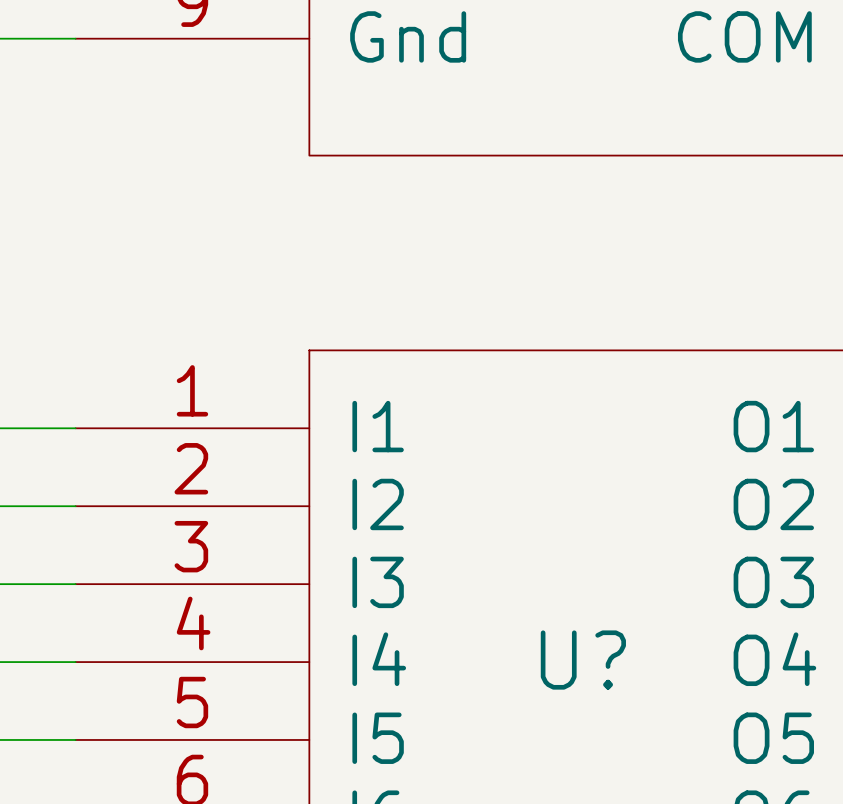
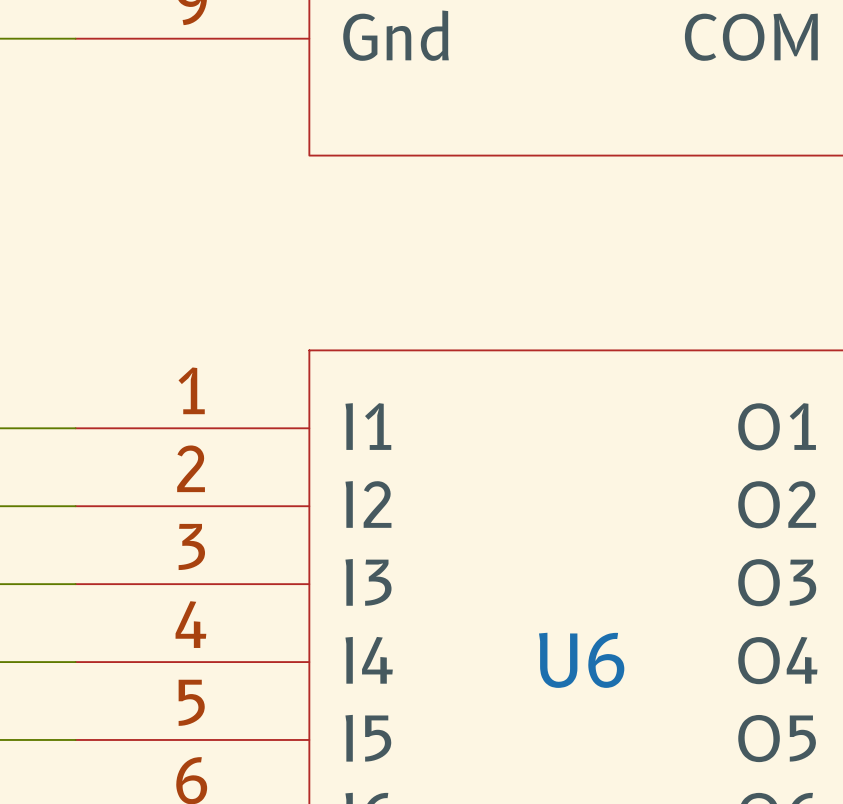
U? name: U? (583, 660) -> U6 (581, 660)

